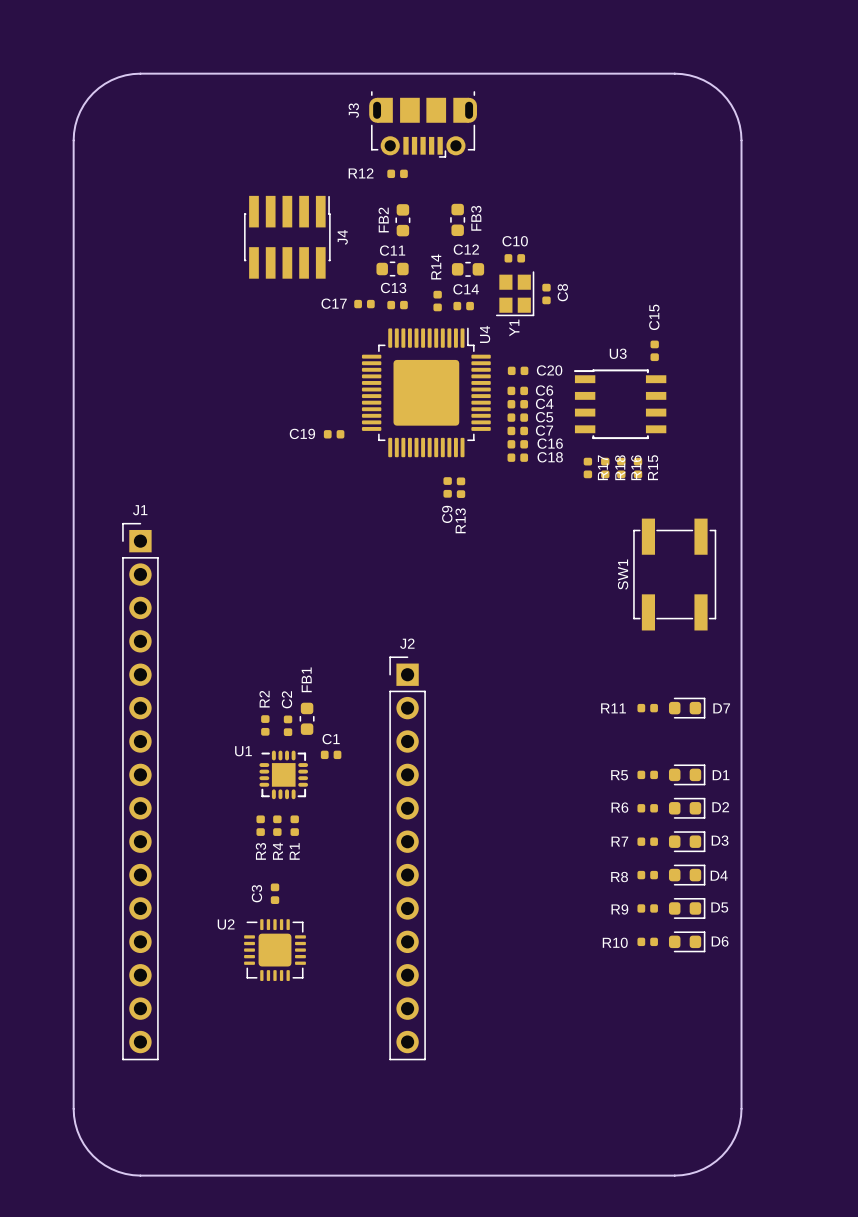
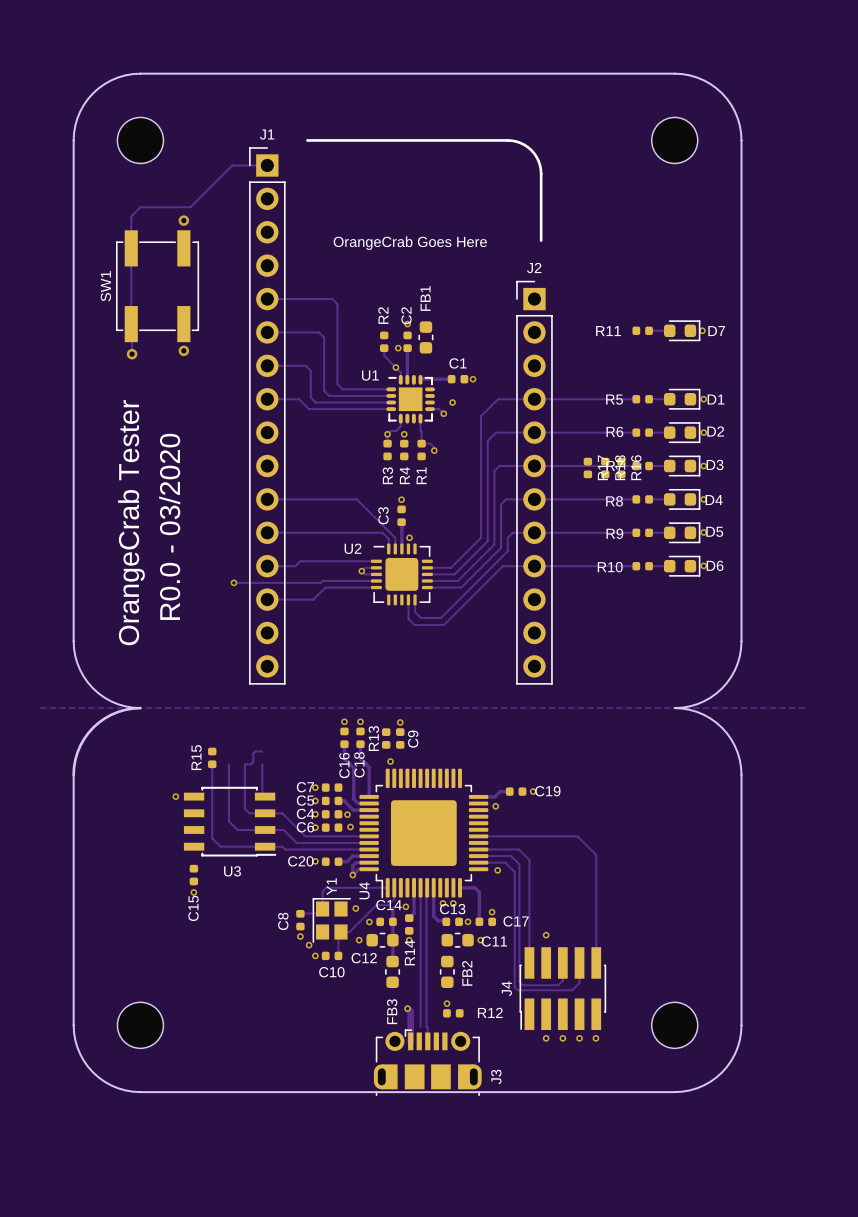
J3 rotation: 0° (423, 124) -> 180° (427, 1062)
J3 position: (423, 124) -> (427, 1062)
part: none -> (140, 140)
line: none -> (307, 140) (507, 140) (520, 142) (534, 153) (540, 165) (541, 240)
part: none -> (674, 140)
track: none -> (267, 165) (232, 165) (190, 207) (140, 207) (131, 216) (132, 354)
R12 name position: R12 (361, 173) -> R12 (490, 1012)
R12 position: (397, 173) -> (453, 1013)
FB3 name position: FB3 (476, 218) -> FB3 (392, 1011)
FB3 position: (457, 219) -> (392, 971)
via: none -> (183, 220)
FB2 name position: FB2 (383, 220) -> FB2 (467, 973)
FB2 position: (402, 220) -> (447, 971)
J4 rotation: 0° (287, 237) -> 180° (562, 988)
J4 position: (287, 237) -> (562, 988)
C10 name position: C10 (515, 241) -> C10 (331, 972)
text: none -> OrangeCrab Goes Here (410, 243)
C12 name position: C12 (466, 249) -> C12 (364, 958)
C11 name position: C11 (392, 250) -> C11 (494, 941)
C10 position: (514, 258) -> (332, 955)
R14 name position: R14 (436, 266) -> R14 (409, 952)
C11 position: (392, 269) -> (457, 940)
C12 position: (468, 269) -> (382, 940)
C13 name position: C13 (393, 287) -> C13 (452, 909)
C8 name position: C8 (562, 292) -> C8 (283, 921)
Y1 rotation: 0° (515, 293) -> 180° (331, 920)
Y1 position: (515, 293) -> (331, 920)
C8 position: (546, 294) -> (300, 920)
track: none -> (267, 299) (332, 299) (337, 304) (337, 384) (342, 389) (391, 389)
R14 position: (437, 301) -> (409, 924)
C17 name position: C17 (334, 303) -> C17 (516, 921)
C17 position: (364, 304) -> (485, 921)
C13 position: (397, 305) -> (452, 921)
C14 position: (463, 306) -> (386, 921)
C15 name position: C15 (654, 317) -> C15 (193, 908)
via: none -> (407, 324)
track: none -> (649, 330) (669, 330)
via: none -> (702, 330)
track: none -> (267, 332) (319, 332) (324, 337) (324, 390) (329, 395) (391, 395)
track: none -> (384, 348) (384, 355) (400, 372) (400, 379)
via: none -> (398, 348)
track: none -> (407, 348) (407, 379)
via: none -> (183, 350)
C15 position: (654, 350) -> (193, 875)
via: none -> (132, 354)
track: none -> (267, 365) (305, 365) (310, 370) (310, 397) (315, 402) (391, 402)
via: none -> (395, 367)
C20 position: (518, 370) -> (332, 861)
C20 name position: C20 (549, 370) -> C20 (300, 861)
track: none -> (451, 379) (420, 379)
via: none -> (473, 379)
C6 position: (517, 390) -> (332, 827)
C6 name position: C6 (544, 390) -> C6 (305, 827)
U4 rotation: 0° (426, 392) -> 180° (423, 833)
U4 position: (426, 392) -> (423, 833)
track: none -> (267, 399) (299, 399) (308, 409) (391, 409)
track: none -> (636, 399) (498, 399) (481, 416) (481, 537) (450, 567) (427, 567)
track: none -> (649, 399) (669, 399)
via: none -> (703, 399)
via: none -> (452, 402)
C4 name position: C4 (544, 403) -> C4 (305, 813)
C4 position: (517, 404) -> (332, 814)
U3 rotation: 0° (620, 404) -> 180° (230, 821)
U3 position: (620, 404) -> (230, 821)
track: none -> (430, 409) (439, 409) (443, 413)
via: none -> (443, 413)
C5 position: (517, 417) -> (332, 800)
C5 name position: C5 (544, 417) -> C5 (305, 800)
track: none -> (400, 418) (400, 426) (396, 430) (390, 430) (387, 434) (387, 443)
track: none -> (420, 418) (421, 443) (430, 443) (434, 450)
C7 position: (517, 430) -> (332, 787)
C7 name position: C7 (544, 430) -> C7 (305, 787)
track: none -> (636, 432) (496, 432) (487, 440) (487, 541) (454, 574) (427, 574)
track: none -> (649, 432) (669, 432)
via: none -> (703, 432)
C19 name position: C19 (302, 433) -> C19 (547, 791)
C19 position: (334, 434) -> (516, 791)
via: none -> (387, 434)
via: none -> (404, 434)
C16 rotation: 0° (517, 444) -> 90° clockwise (344, 737)
C16 position: (517, 444) -> (344, 737)
via: none -> (434, 450)
C18 rotation: 0° (517, 457) -> 90° clockwise (360, 737)
C18 position: (517, 457) -> (360, 737)
track: none -> (636, 466) (499, 466) (494, 471) (494, 544) (457, 580) (427, 580)
track: none -> (649, 466) (669, 466)
via: none -> (703, 466)
R15 position: (637, 467) -> (212, 757)
R15 name position: R15 (653, 467) -> R15 (196, 757)
C9 position: (447, 487) -> (400, 738)
R13 position: (461, 487) -> (386, 738)
track: none -> (267, 499) (356, 499) (395, 537) (395, 542)
via: none -> (401, 499)
track: none -> (636, 499) (506, 499) (501, 504) (501, 547) (461, 587) (427, 587)
track: none -> (649, 499) (669, 499)
via: none -> (703, 499)
C9 name position: C9 (447, 514) -> C9 (413, 739)
R13 name position: R13 (460, 520) -> R13 (373, 738)
text: none -> OrangeCrab Tester (131, 522)
track: none -> (401, 522) (401, 548)
text: none -> R0.0 - 03/2020 (169, 526)
track: none -> (267, 532) (382, 532) (388, 539) (388, 548)
track: none -> (636, 532) (512, 532) (507, 537) (507, 551) (440, 617) (420, 617) (415, 612) (415, 599)
track: none -> (649, 532) (669, 532)
via: none -> (703, 532)
via: none -> (409, 537)
track: none -> (376, 561) (300, 561) (295, 566) (267, 566)
via: none -> (703, 565)
track: none -> (636, 566) (502, 566) (443, 624) (414, 624) (408, 618) (408, 599)
track: none -> (649, 566) (669, 566)
track: none -> (376, 567) (365, 567) (361, 571) (365, 574) (376, 574)
via: none -> (361, 571)
SW1 position: (674, 574) -> (157, 286)
track: none -> (376, 580) (233, 582)
via: none -> (233, 582)
track: none -> (376, 587) (325, 587) (313, 599) (267, 599)
board edge: (73, 641) (73, 774) -> (73, 641) (75, 656) (80, 670) (93, 688) (111, 701) (125, 706) (140, 708) (125, 709) (111, 714) (93, 727) (80, 745) (75, 760) (73, 774)
board edge: (741, 641) (741, 774) -> (741, 641) (739, 656) (734, 670) (721, 688) (703, 701) (689, 706) (674, 708) (689, 709) (703, 714) (721, 727) (731, 739) (737, 752) (741, 774)
zone outline: none -> (40, 708) (808, 708)
R11 position: (647, 708) -> (642, 330)
D7 position: (687, 708) -> (682, 330)
FB1 position: (307, 718) -> (425, 337)
via: none -> (344, 721)
via: none -> (360, 721)
via: none -> (400, 722)
R2 position: (265, 725) -> (384, 341)
C2 position: (288, 725) -> (407, 341)
track: none -> (344, 744) (344, 758) (353, 768) (353, 799) (358, 803) (369, 803)
track: none -> (360, 744) (360, 758) (369, 767) (369, 796)
track: none -> (262, 751) (255, 751) (253, 753) (253, 762) (251, 764) (244, 764) (244, 808) (249, 813) (282, 813) (305, 836) (369, 836)
C1 position: (331, 754) -> (458, 379)
via: none -> (390, 761)
track: none -> (212, 764) (212, 838) (220, 846) (282, 846) (285, 849) (369, 849)
track: none -> (228, 764) (228, 821) (237, 829) (283, 829) (296, 842) (369, 842)
track: none -> (262, 764) (262, 793) (265, 796)
U1 position: (283, 774) -> (410, 399)
R5 position: (647, 774) -> (642, 399)
D1 position: (687, 774) -> (682, 399)
via: none -> (315, 787)
J1 position: (140, 791) -> (267, 415)
track: none -> (509, 791) (500, 791) (494, 796) (478, 796)
via: none -> (533, 791)
via: none -> (175, 796)
via: none -> (315, 800)
track: none -> (338, 800) (344, 800) (353, 810) (369, 810)
via: none -> (495, 806)
R6 position: (647, 808) -> (642, 432)
D2 position: (687, 808) -> (682, 432)
via: none -> (315, 814)
via: none -> (347, 814)
R3 position: (260, 825) -> (387, 450)
R4 position: (277, 825) -> (404, 450)
R1 position: (294, 825) -> (421, 450)
via: none -> (350, 826)
via: none -> (315, 827)
track: none -> (478, 836) (577, 836) (596, 855) (596, 962)
R7 position: (647, 841) -> (642, 466)
D3 position: (687, 841) -> (682, 466)
track: none -> (478, 849) (518, 849) (529, 860) (529, 962)
track: none -> (369, 856) (352, 856) (347, 861) (338, 861)
track: none -> (478, 856) (511, 856) (519, 864) (519, 981) (522, 985) (558, 985) (562, 980) (562, 962)
J2 position: (407, 858) -> (534, 482)
via: none -> (315, 861)
track: none -> (369, 862) (355, 862) (352, 865) (352, 875) (358, 869) (369, 869)
track: none -> (478, 862) (505, 862) (514, 872) (514, 987) (517, 990) (572, 990) (579, 982) (579, 962)
via: none -> (497, 870)
via: none -> (352, 875)
R8 position: (647, 875) -> (642, 499)
D4 position: (687, 875) -> (682, 499)
track: none -> (387, 887) (326, 887) (322, 891) (322, 908) (318, 913) (300, 913)
track: none -> (394, 887) (394, 899) (388, 905) (376, 905) (349, 931) (340, 931) (338, 934) (338, 955)
track: none -> (414, 887) (414, 913) (409, 918)
track: none -> (420, 887) (420, 1026)
track: none -> (427, 887) (427, 1041)
track: none -> (433, 887) (433, 916) (438, 920) (446, 920)
track: none -> (460, 887) (474, 887) (479, 892) (479, 921)
via: none -> (193, 892)
C3 position: (275, 893) -> (401, 515)
via: none -> (442, 903)
via: none -> (453, 903)
via: none -> (405, 906)
via: none -> (355, 908)
track: none -> (392, 908) (392, 961)
R9 position: (647, 908) -> (642, 532)
D5 position: (687, 908) -> (682, 532)
via: none -> (492, 912)
via: none -> (468, 921)
via: none -> (369, 922)
via: none -> (546, 935)
via: none -> (300, 936)
via: none -> (359, 940)
via: none -> (409, 940)
via: none -> (480, 940)
R10 position: (647, 941) -> (642, 566)
D6 position: (687, 941) -> (682, 566)
via: none -> (309, 945)
U2 position: (275, 950) -> (401, 574)
via: none -> (315, 955)
via: none -> (446, 1003)
track: none -> (407, 1008) (410, 1011) (410, 1041)
via: none -> (407, 1008)
board edge: (73, 1025) (74, 1116) (80, 1137) (93, 1156) (104, 1165) (118, 1171) (140, 1175) (674, 1175) (689, 1173) (703, 1168) (721, 1156) (731, 1144) (737, 1130) (741, 1108) (741, 1025) -> (73, 1025) (75, 1040) (80, 1054) (93, 1072) (111, 1085) (125, 1090) (140, 1092) (682, 1091) (703, 1085) (716, 1077) (726, 1066) (737, 1047) (741, 1025)
part: none -> (140, 1025)
part: none -> (674, 1025)
via: none -> (546, 1038)
via: none -> (562, 1038)
via: none -> (579, 1038)
via: none -> (595, 1038)

